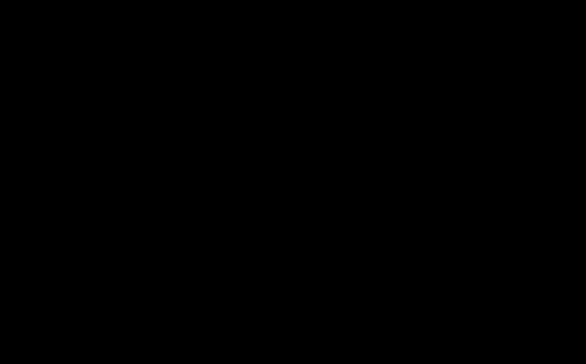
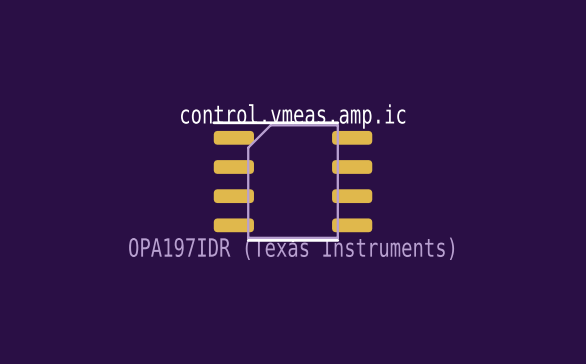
control.vmeas.amp.ic: none -> OPA197IDR (Texas Instruments) (292, 181)

